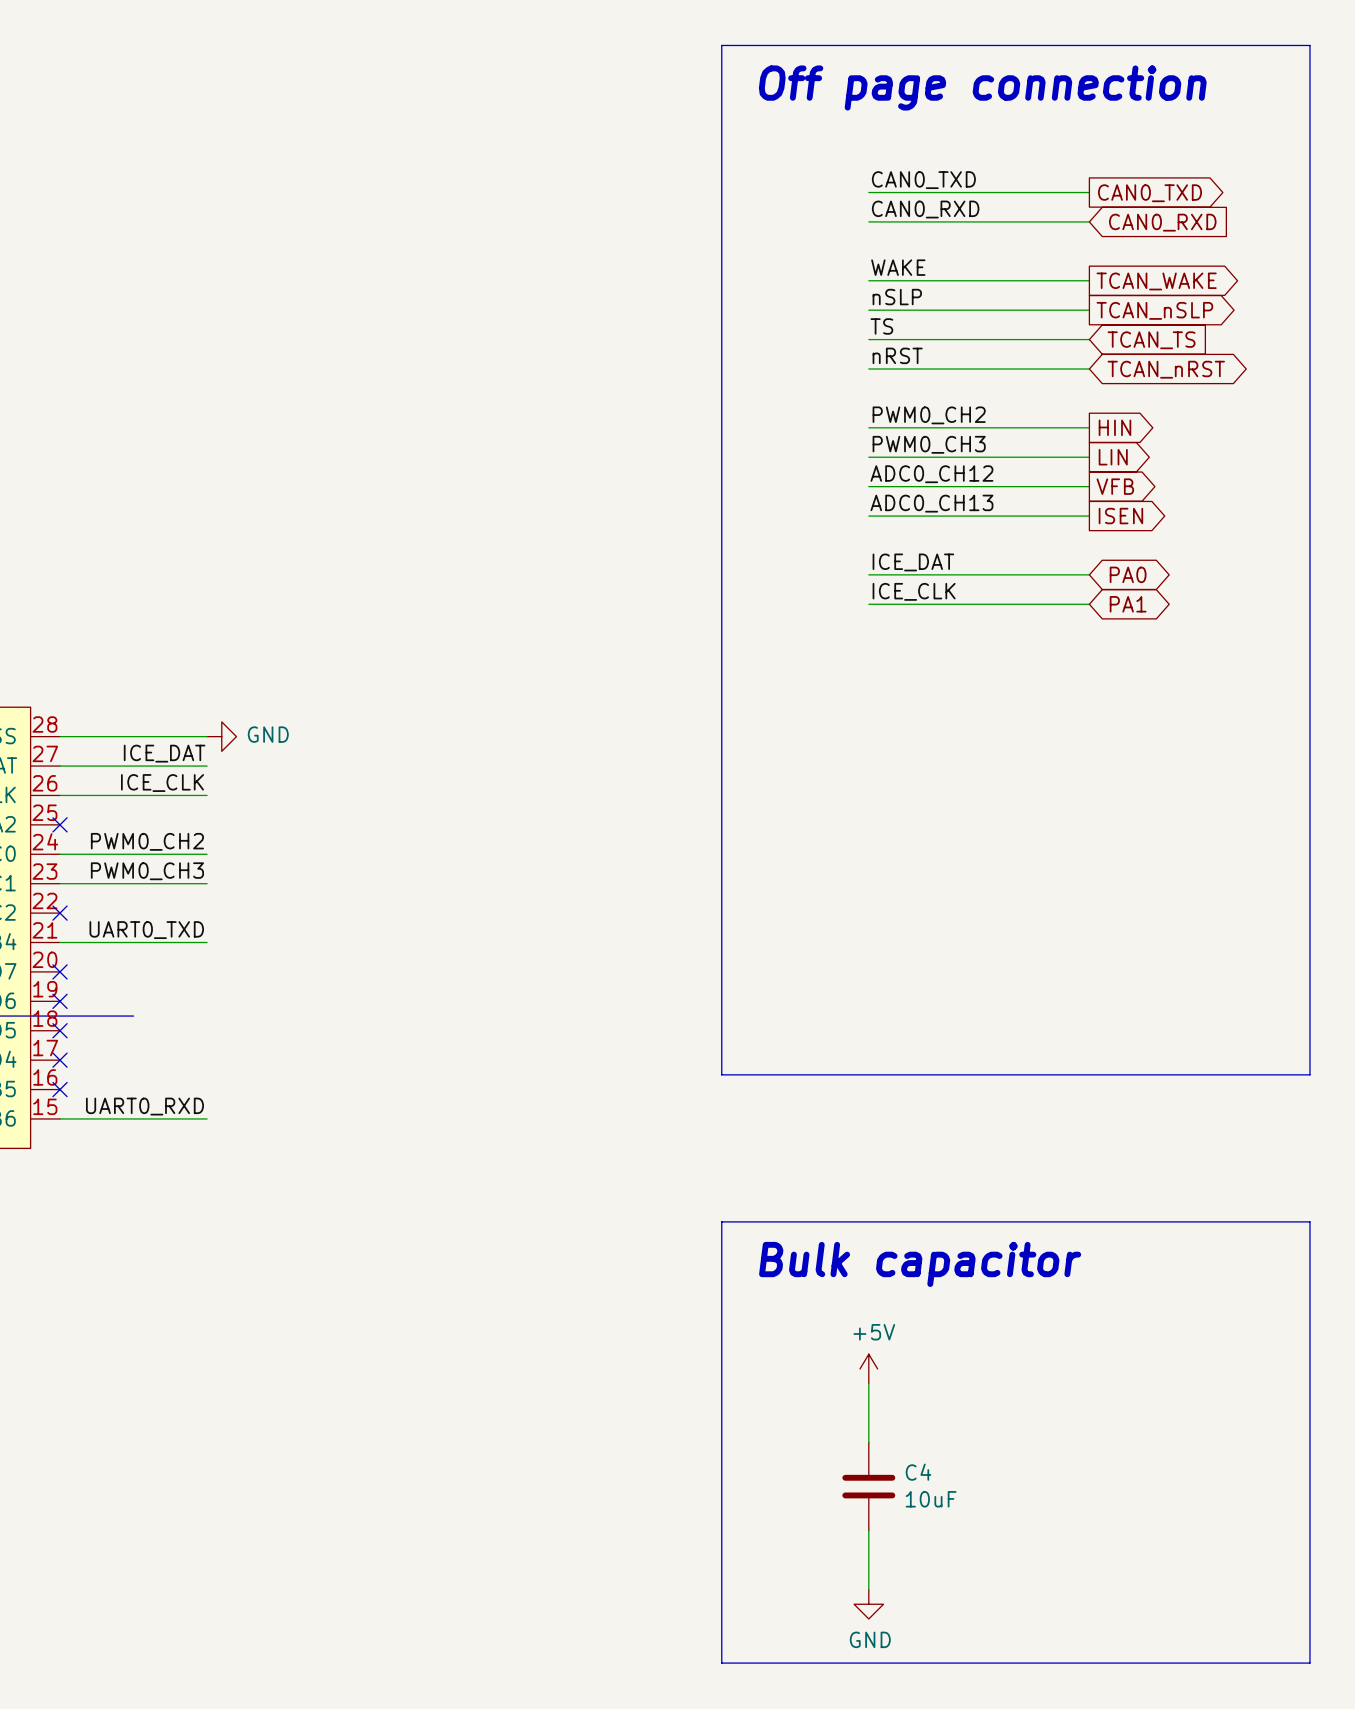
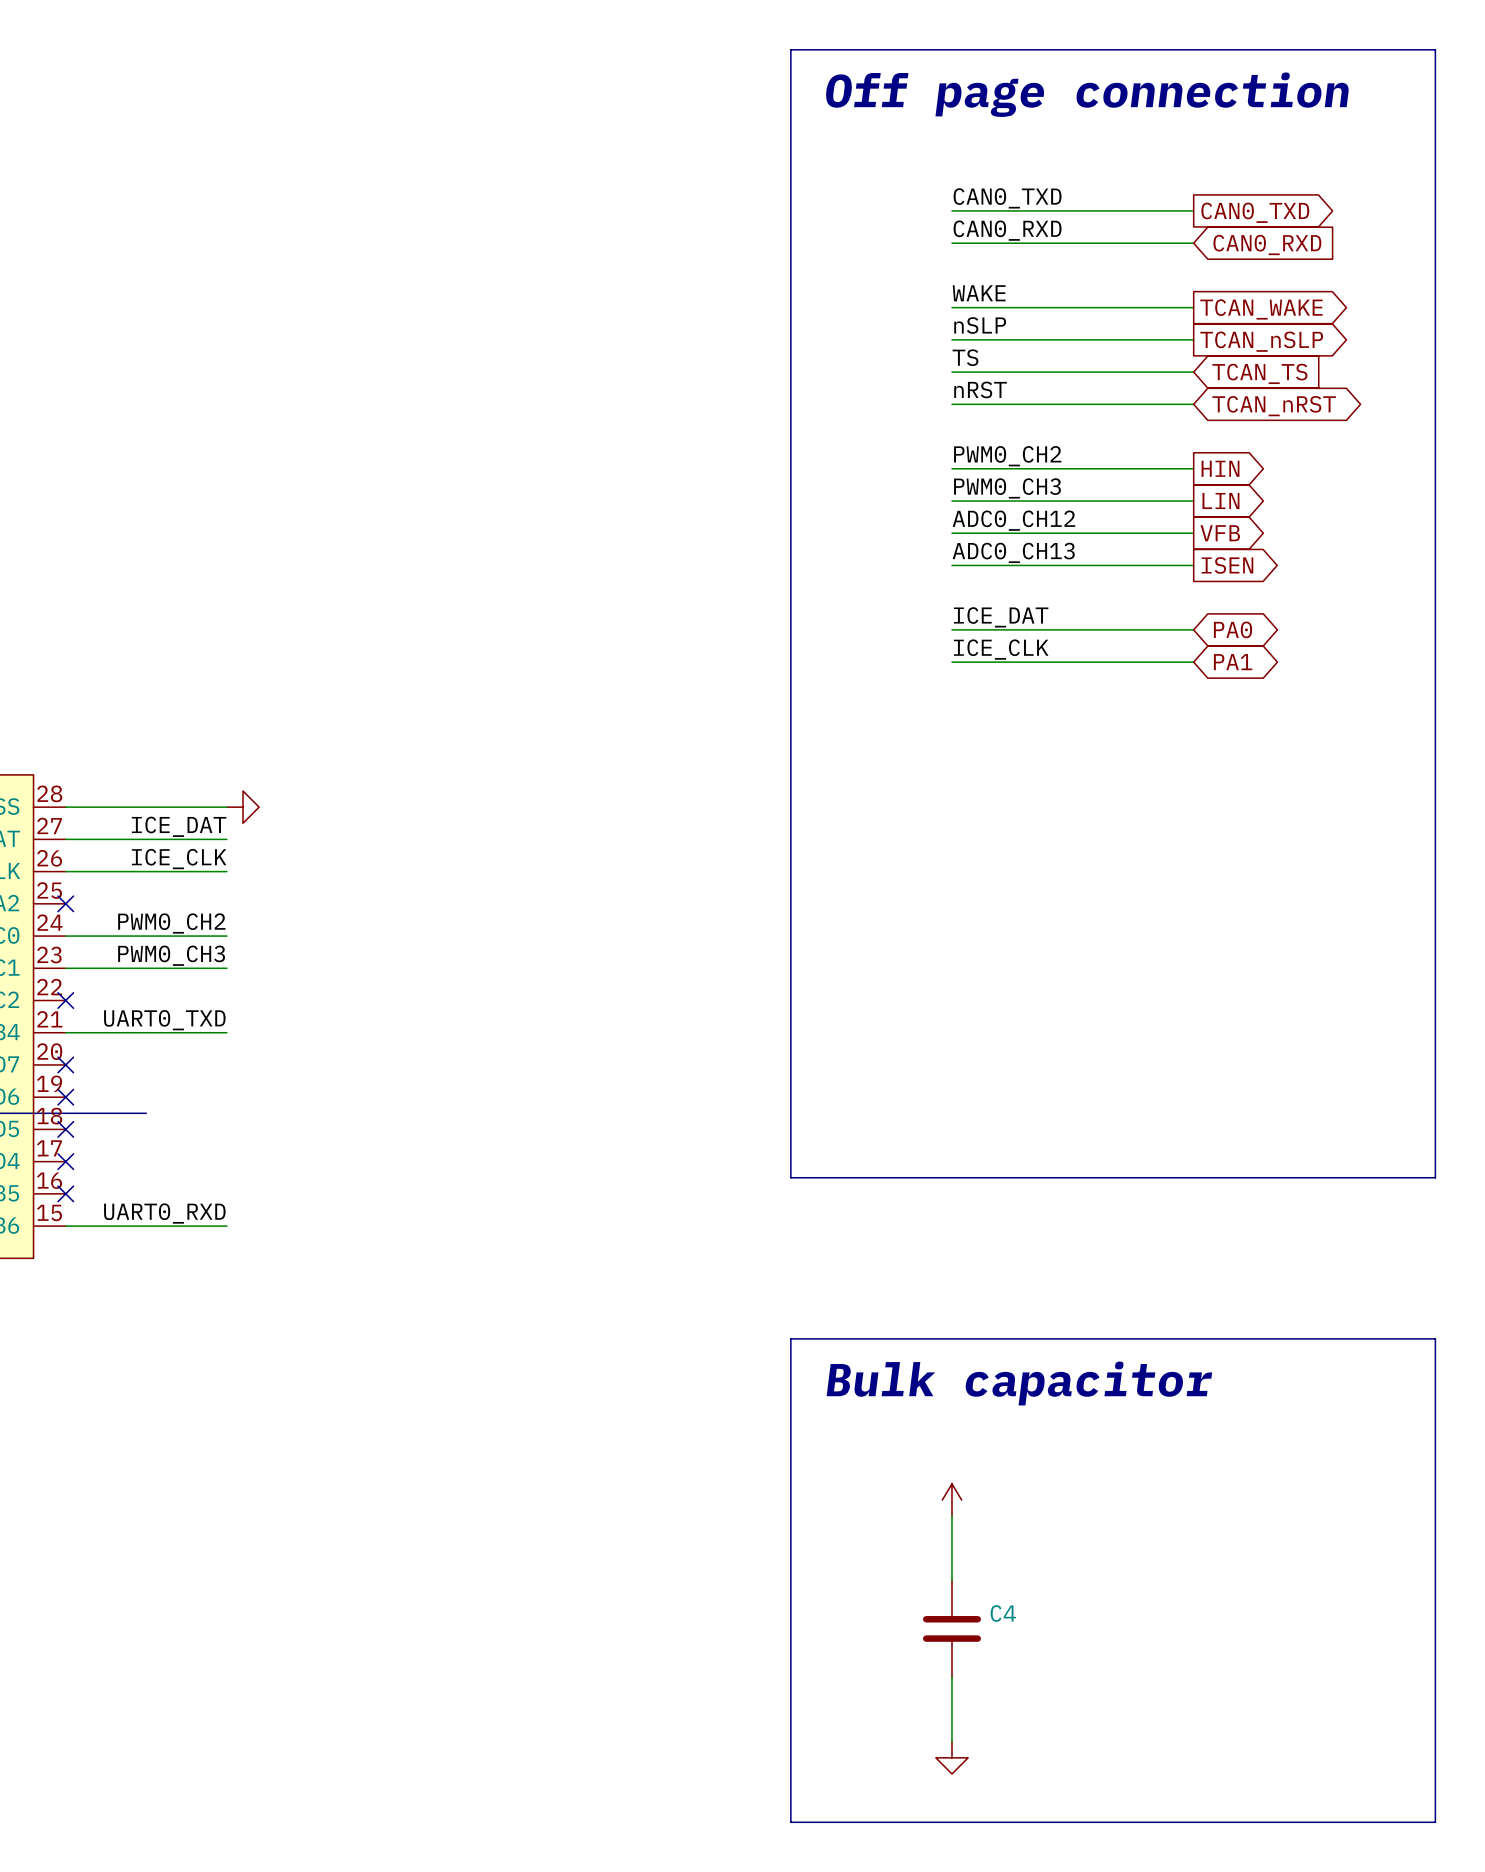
power symbol text: GND (268, 734) -> none
power symbol text: +5V (874, 1332) -> none
C4 value: 10uF (931, 1499) -> none
power symbol text: GND (870, 1639) -> none

